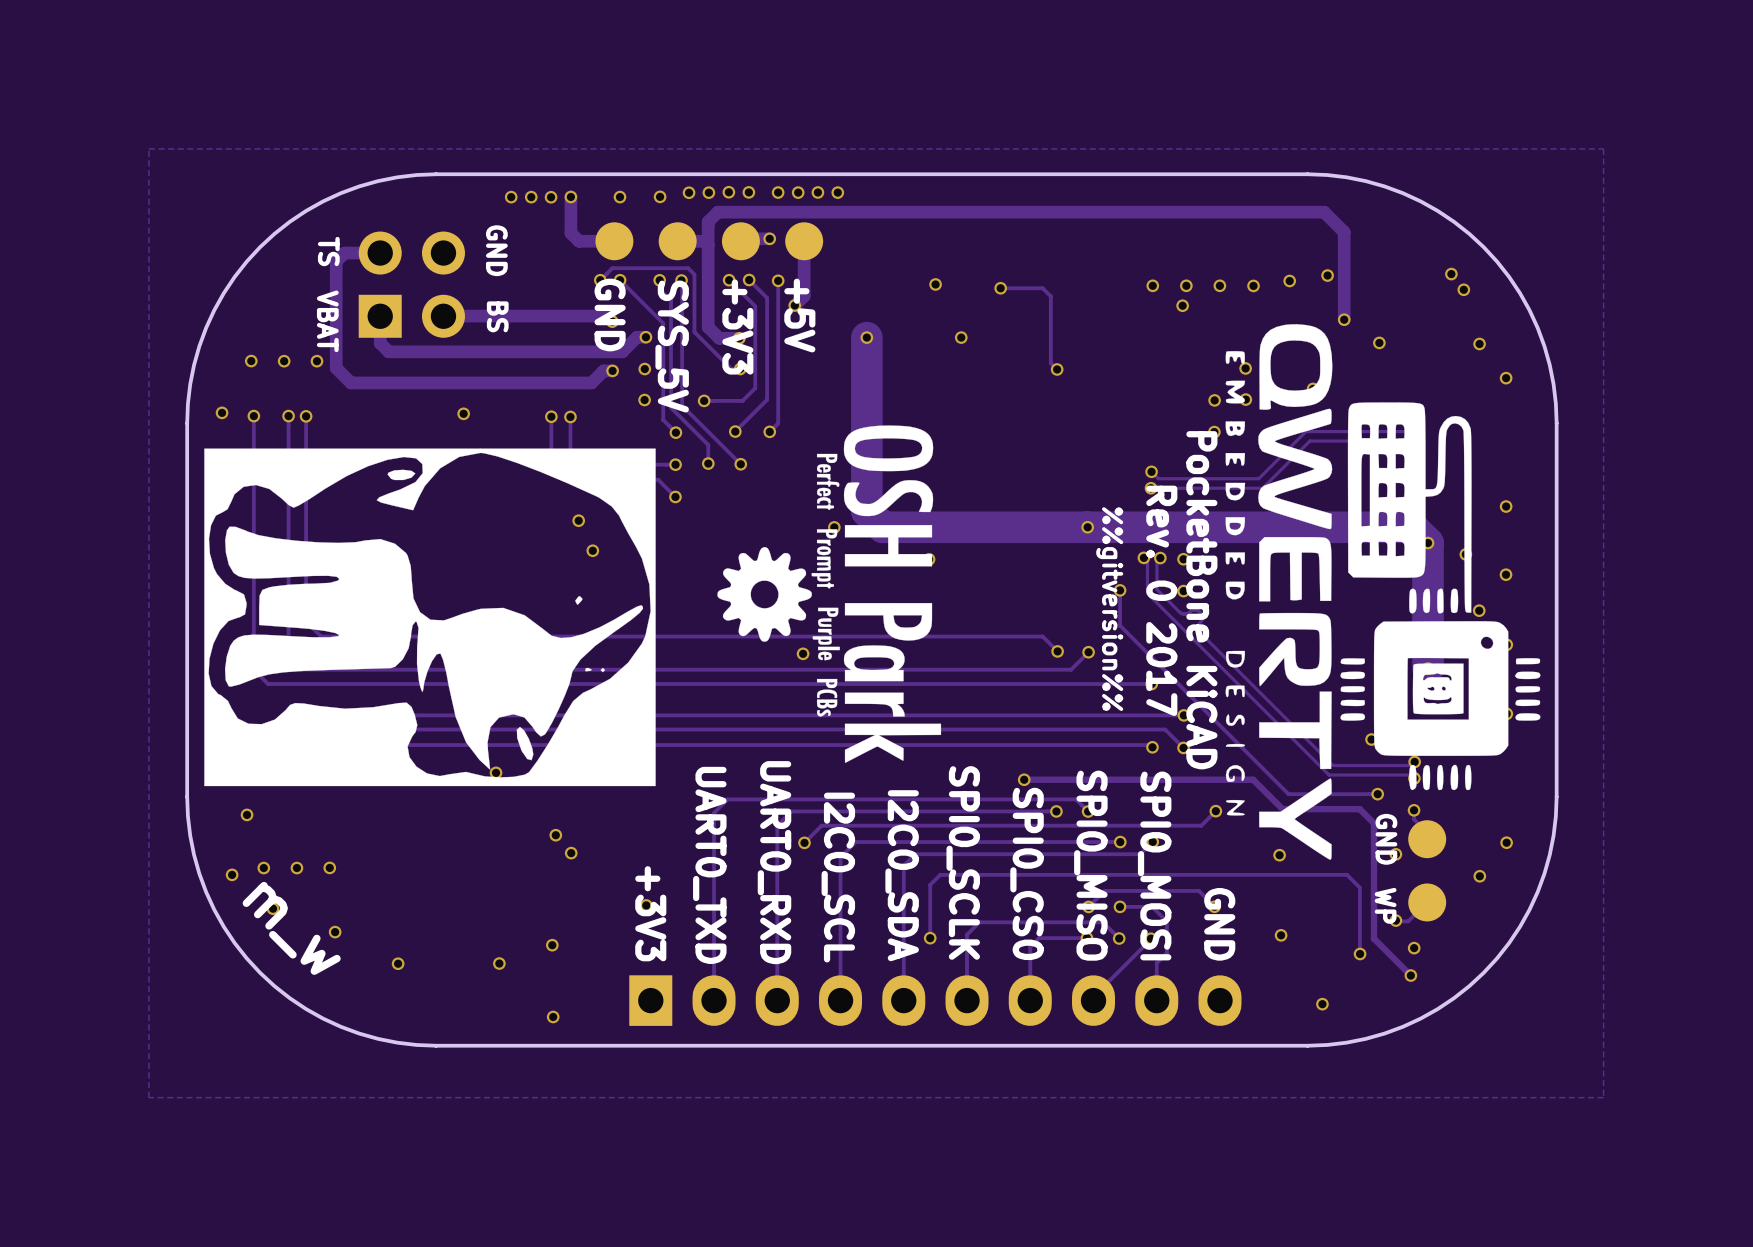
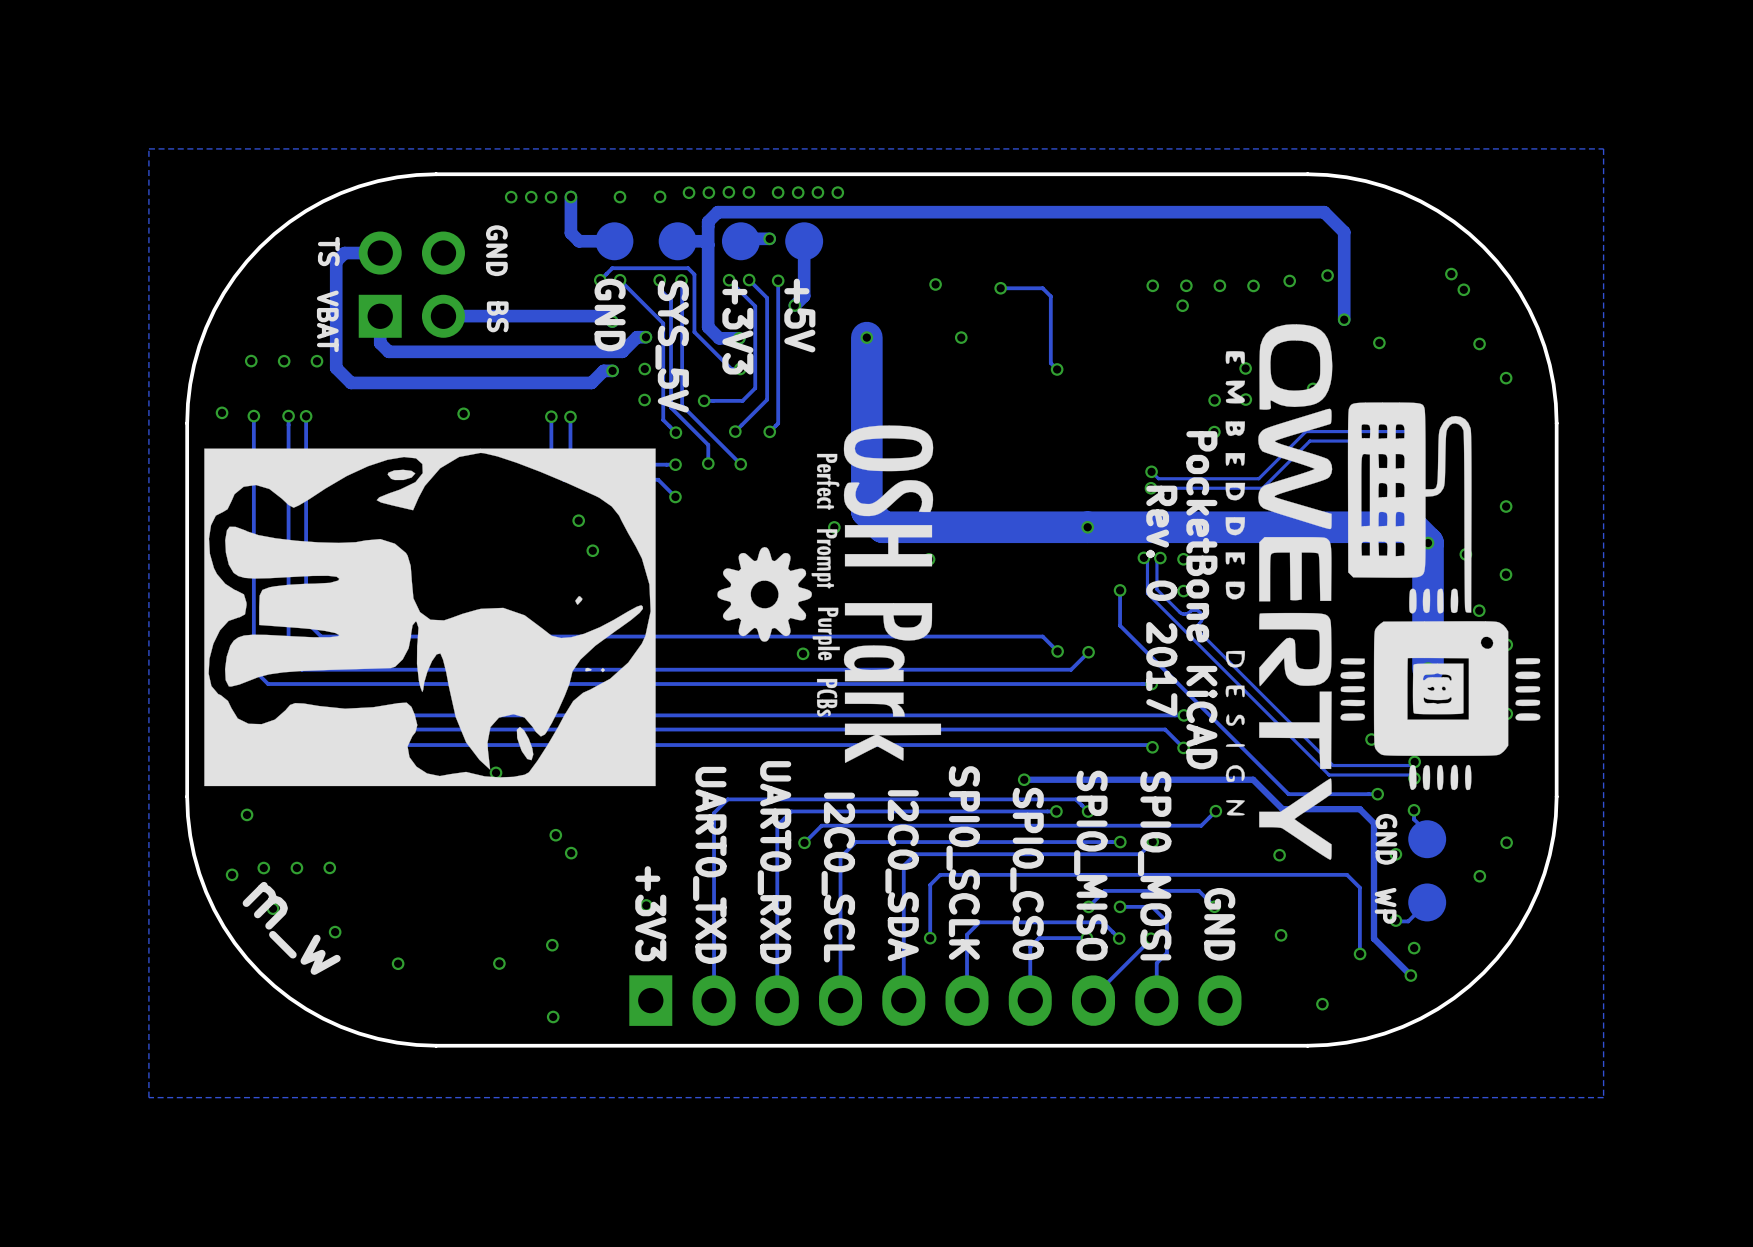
text: %%gitversion%% (1109, 609) -> none

